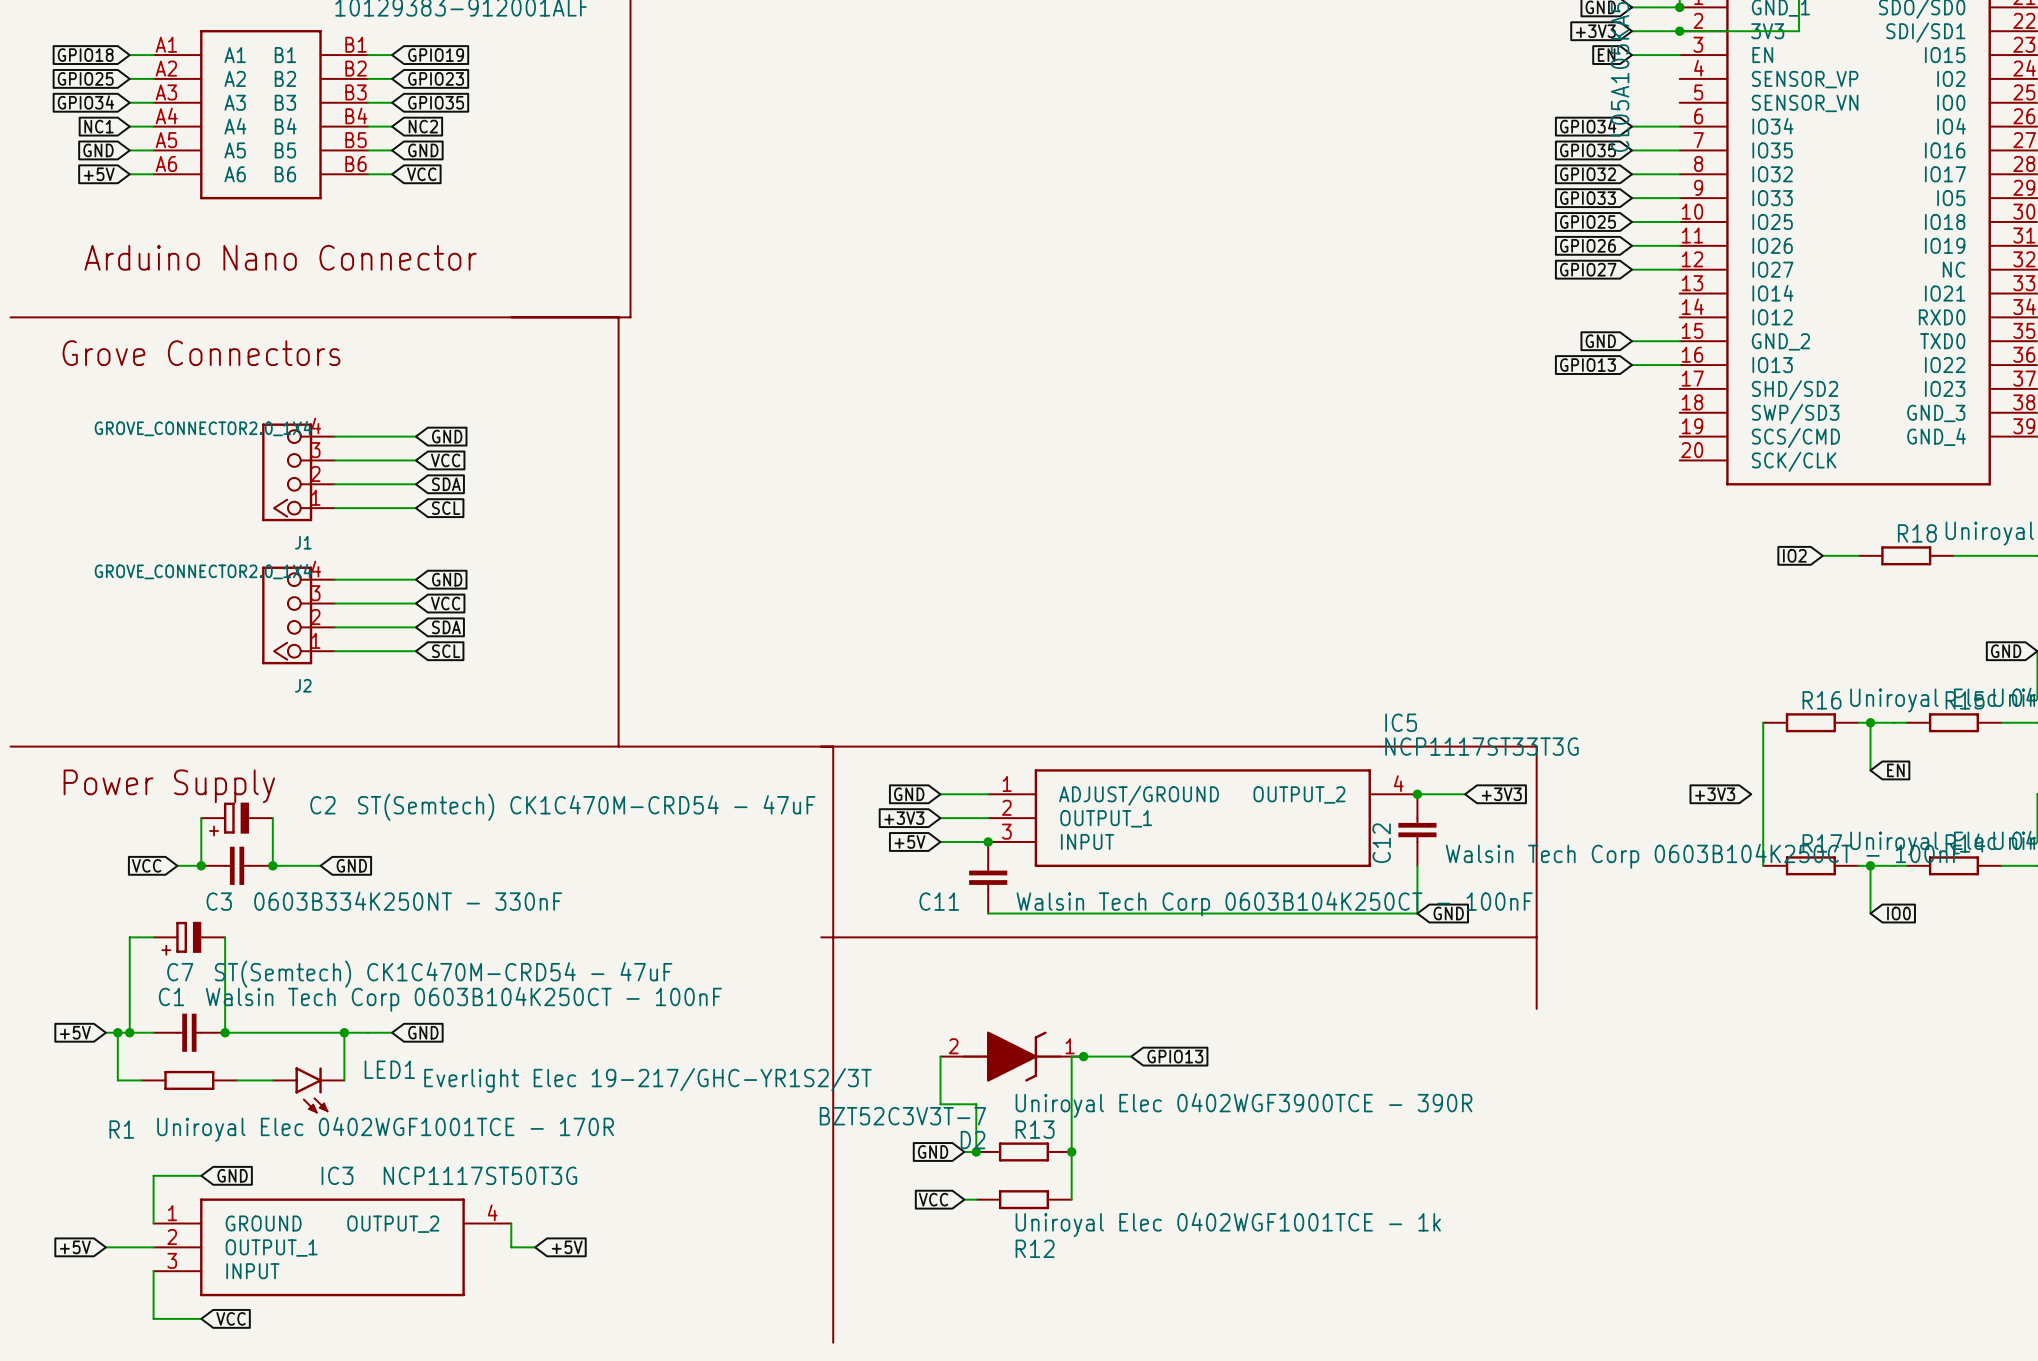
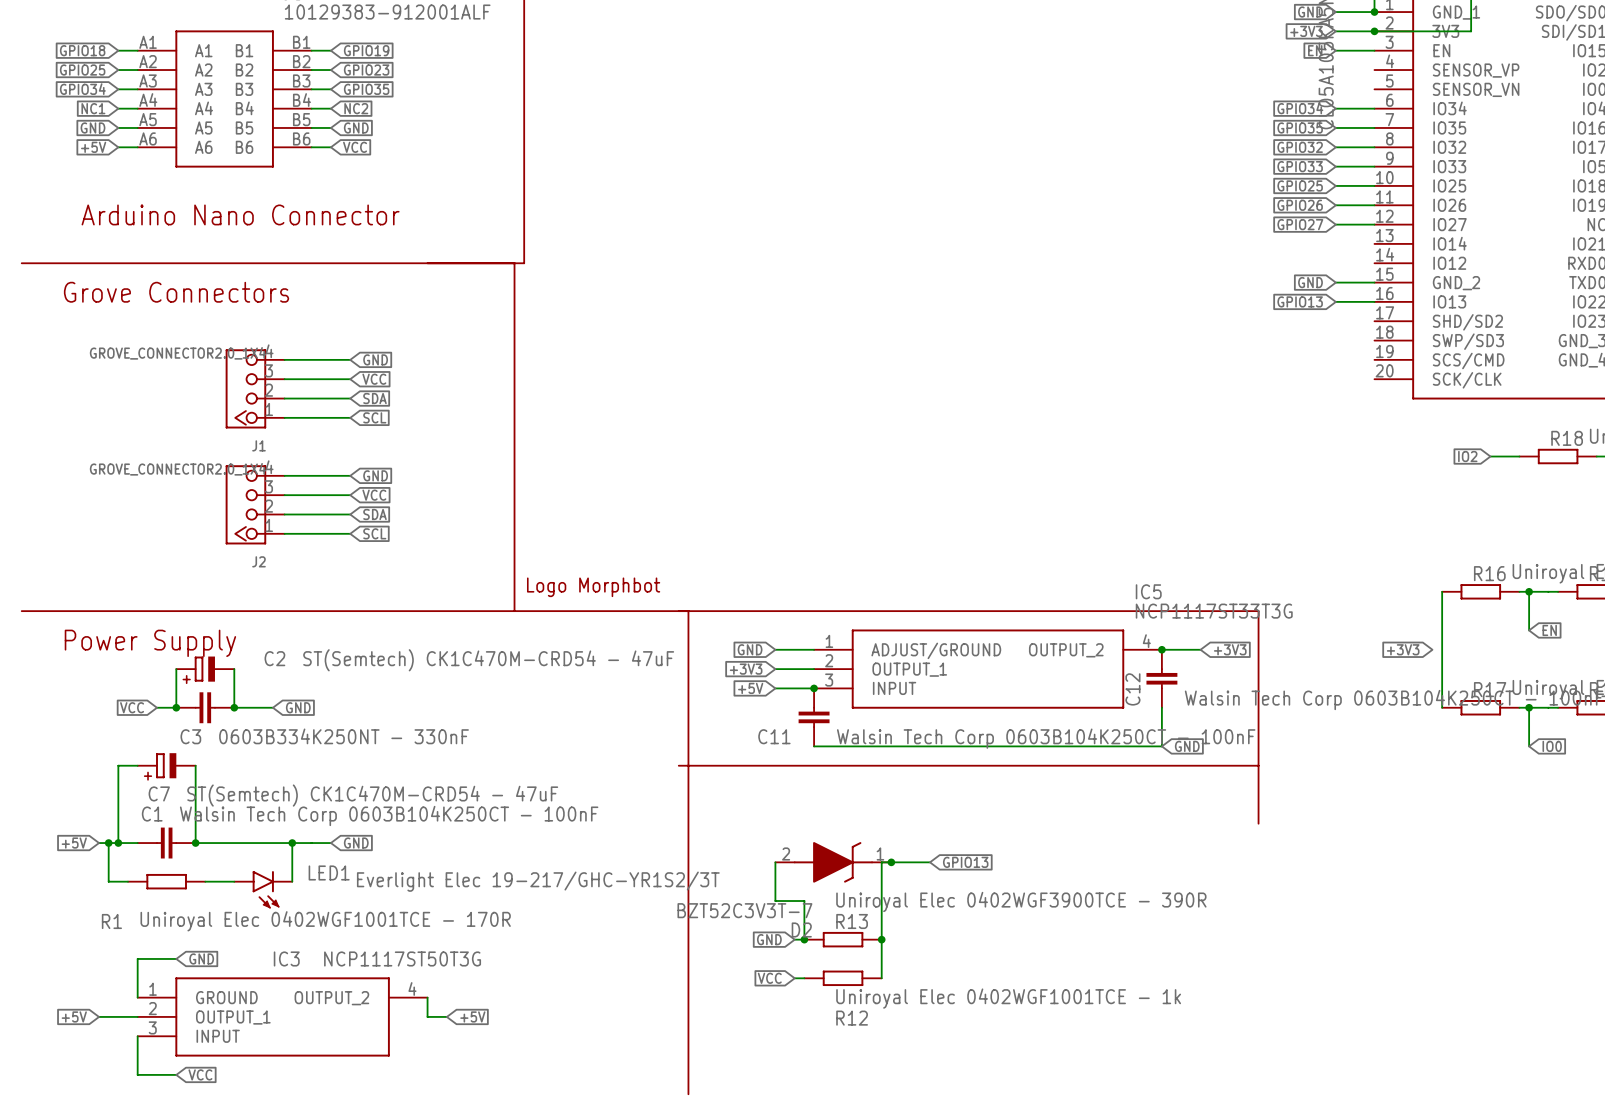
part: none -> (593, 587)

